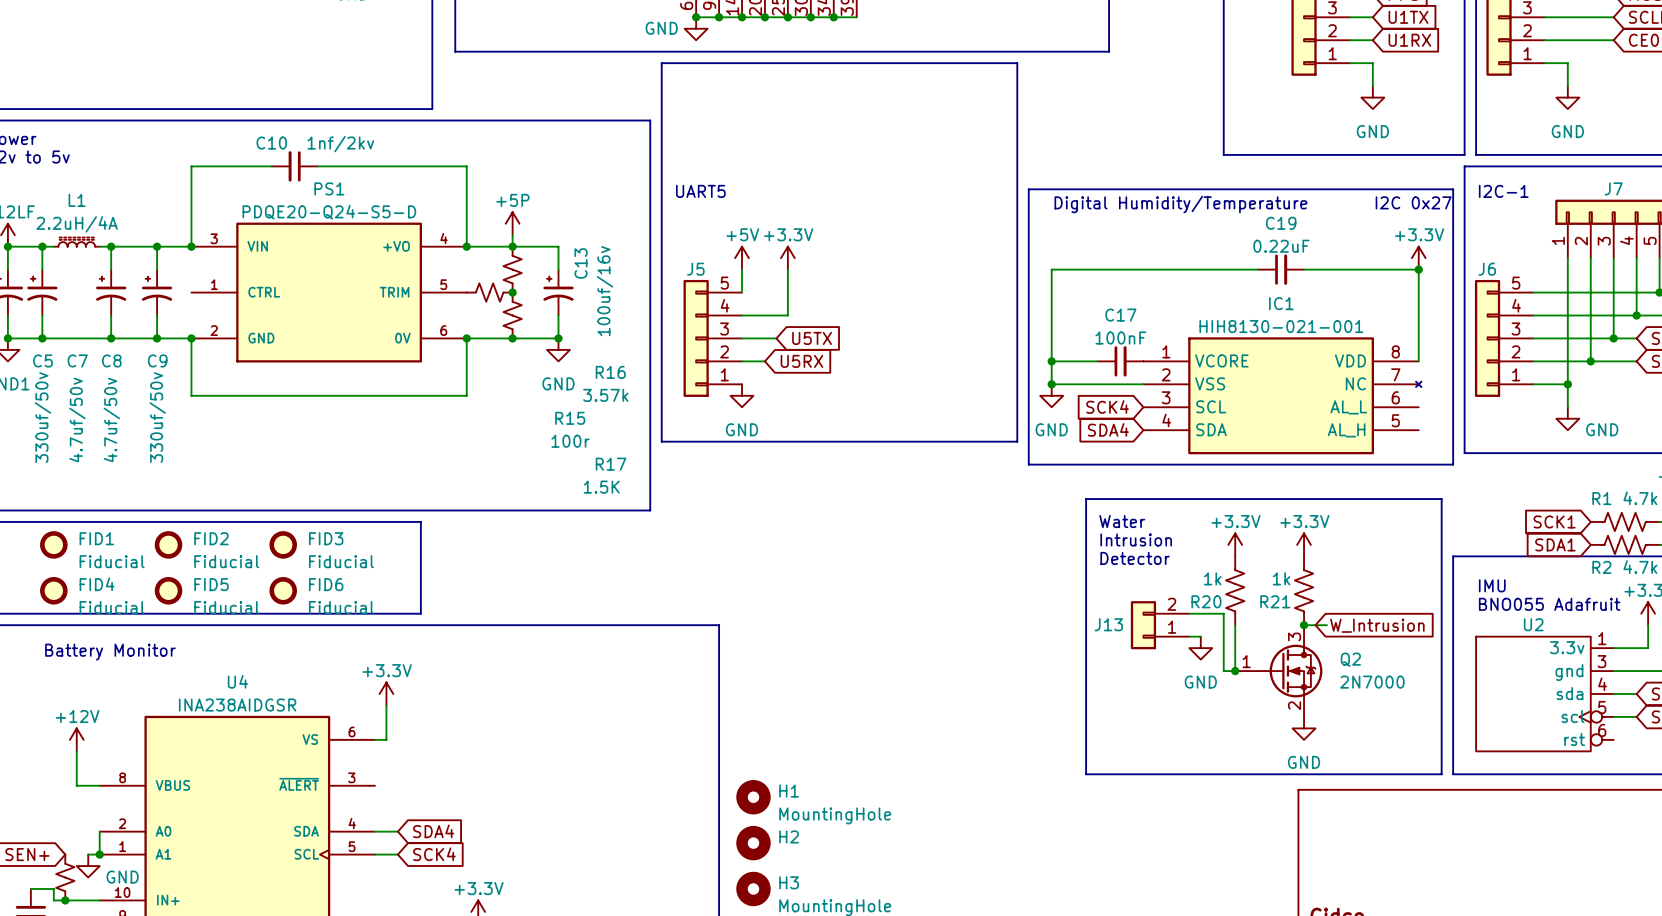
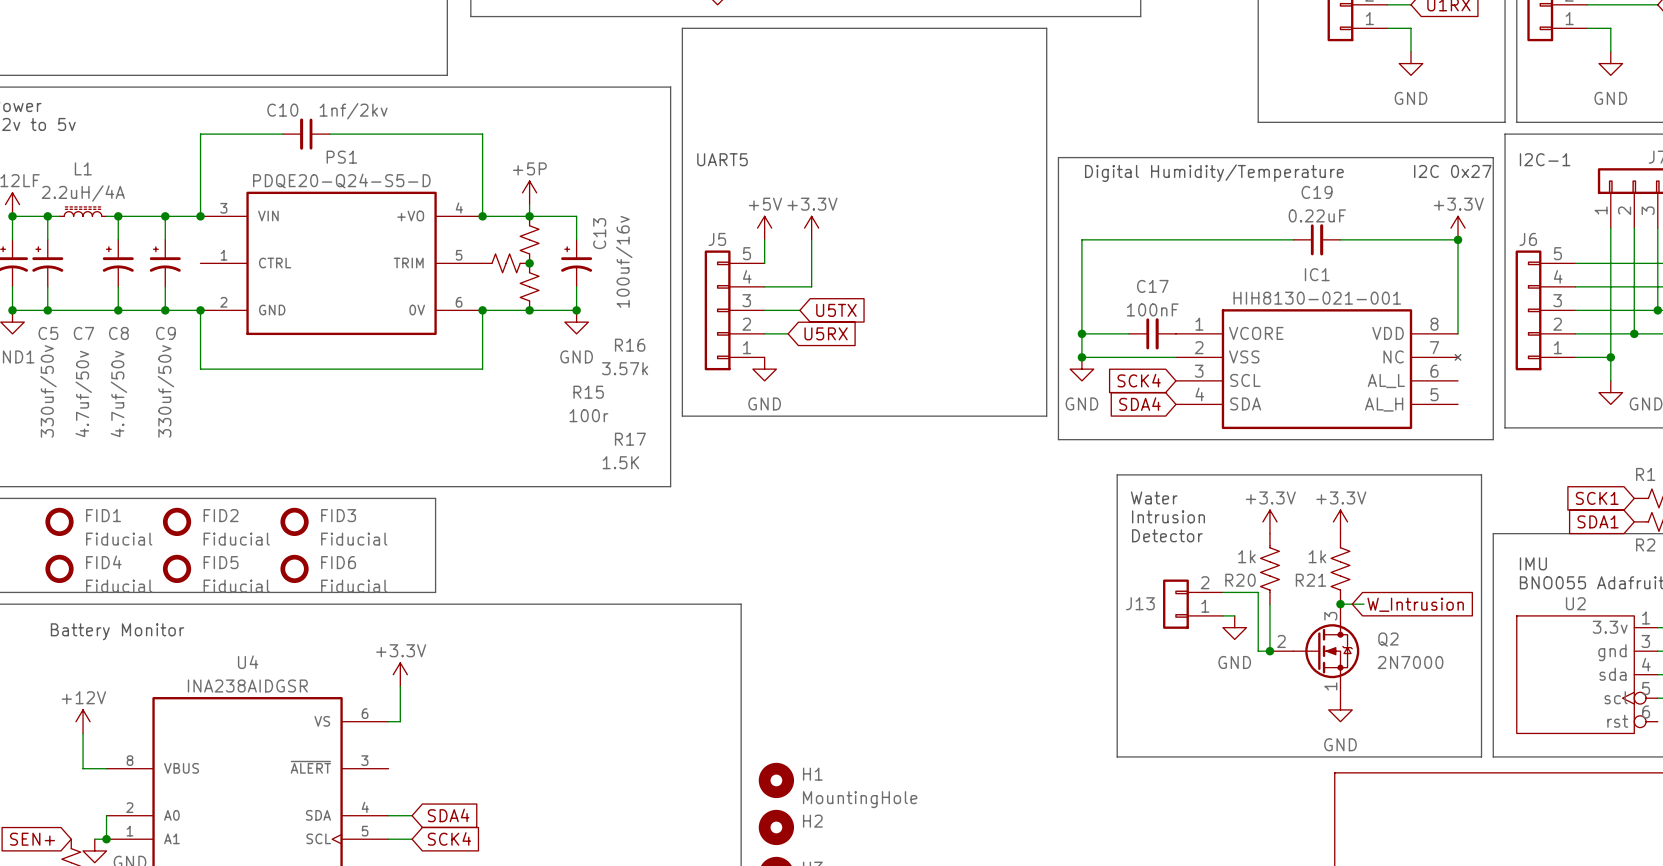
Q2 pin number: 1 (1246, 661) -> 2 (1281, 641)
Q2 pin number: 2 (1294, 705) -> 1 (1330, 686)

